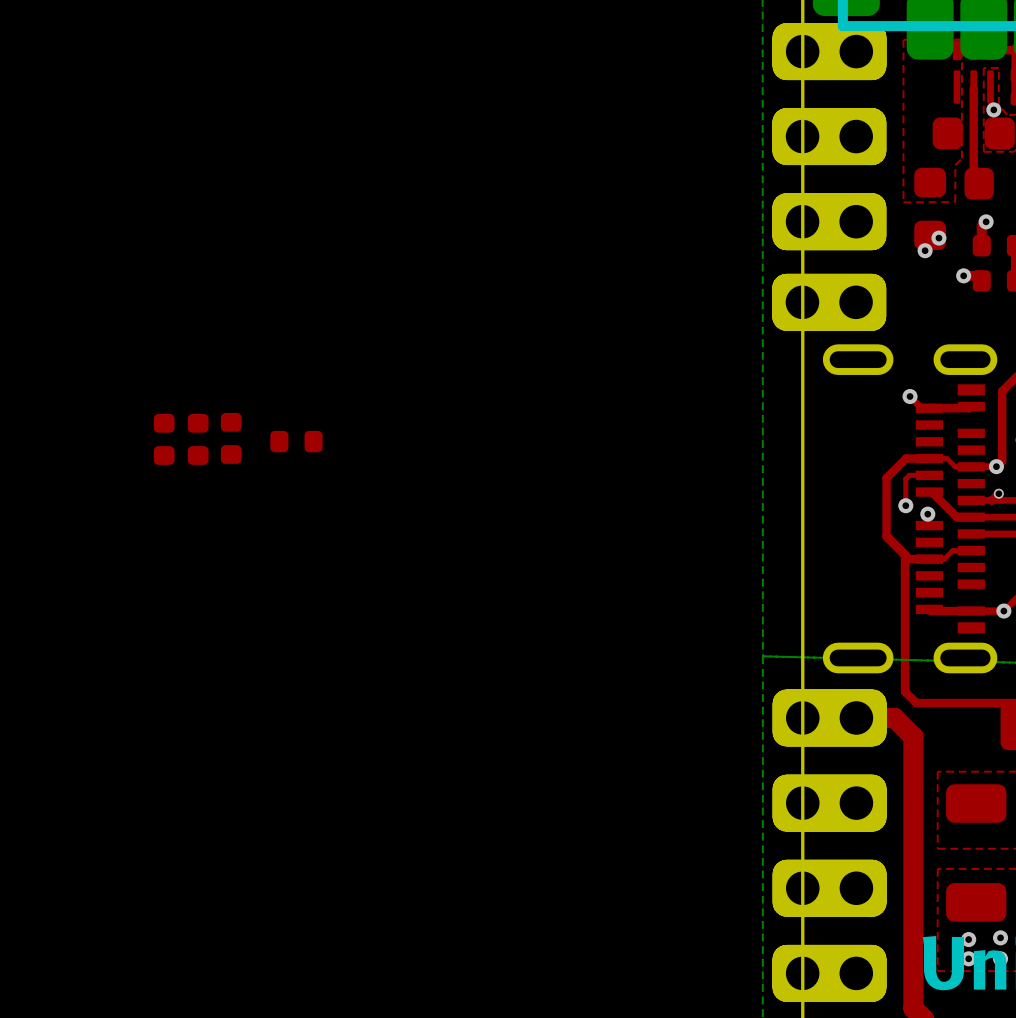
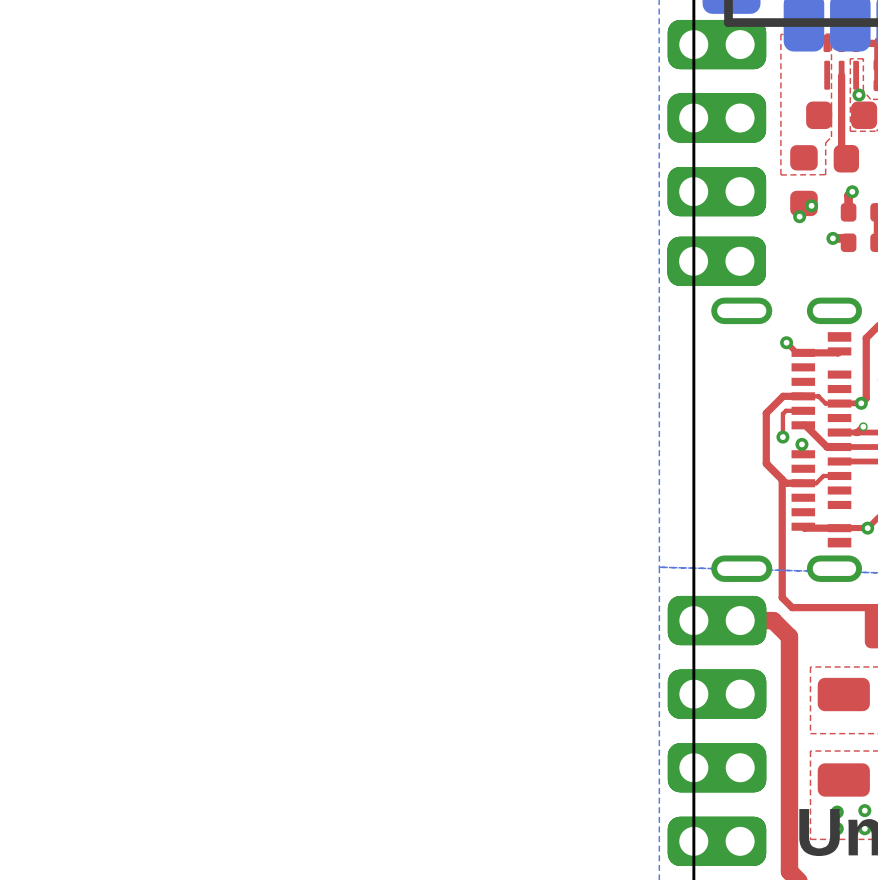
part: (231, 438) -> none
part: (164, 439) -> none
part: (198, 439) -> none
part: (296, 441) -> none

